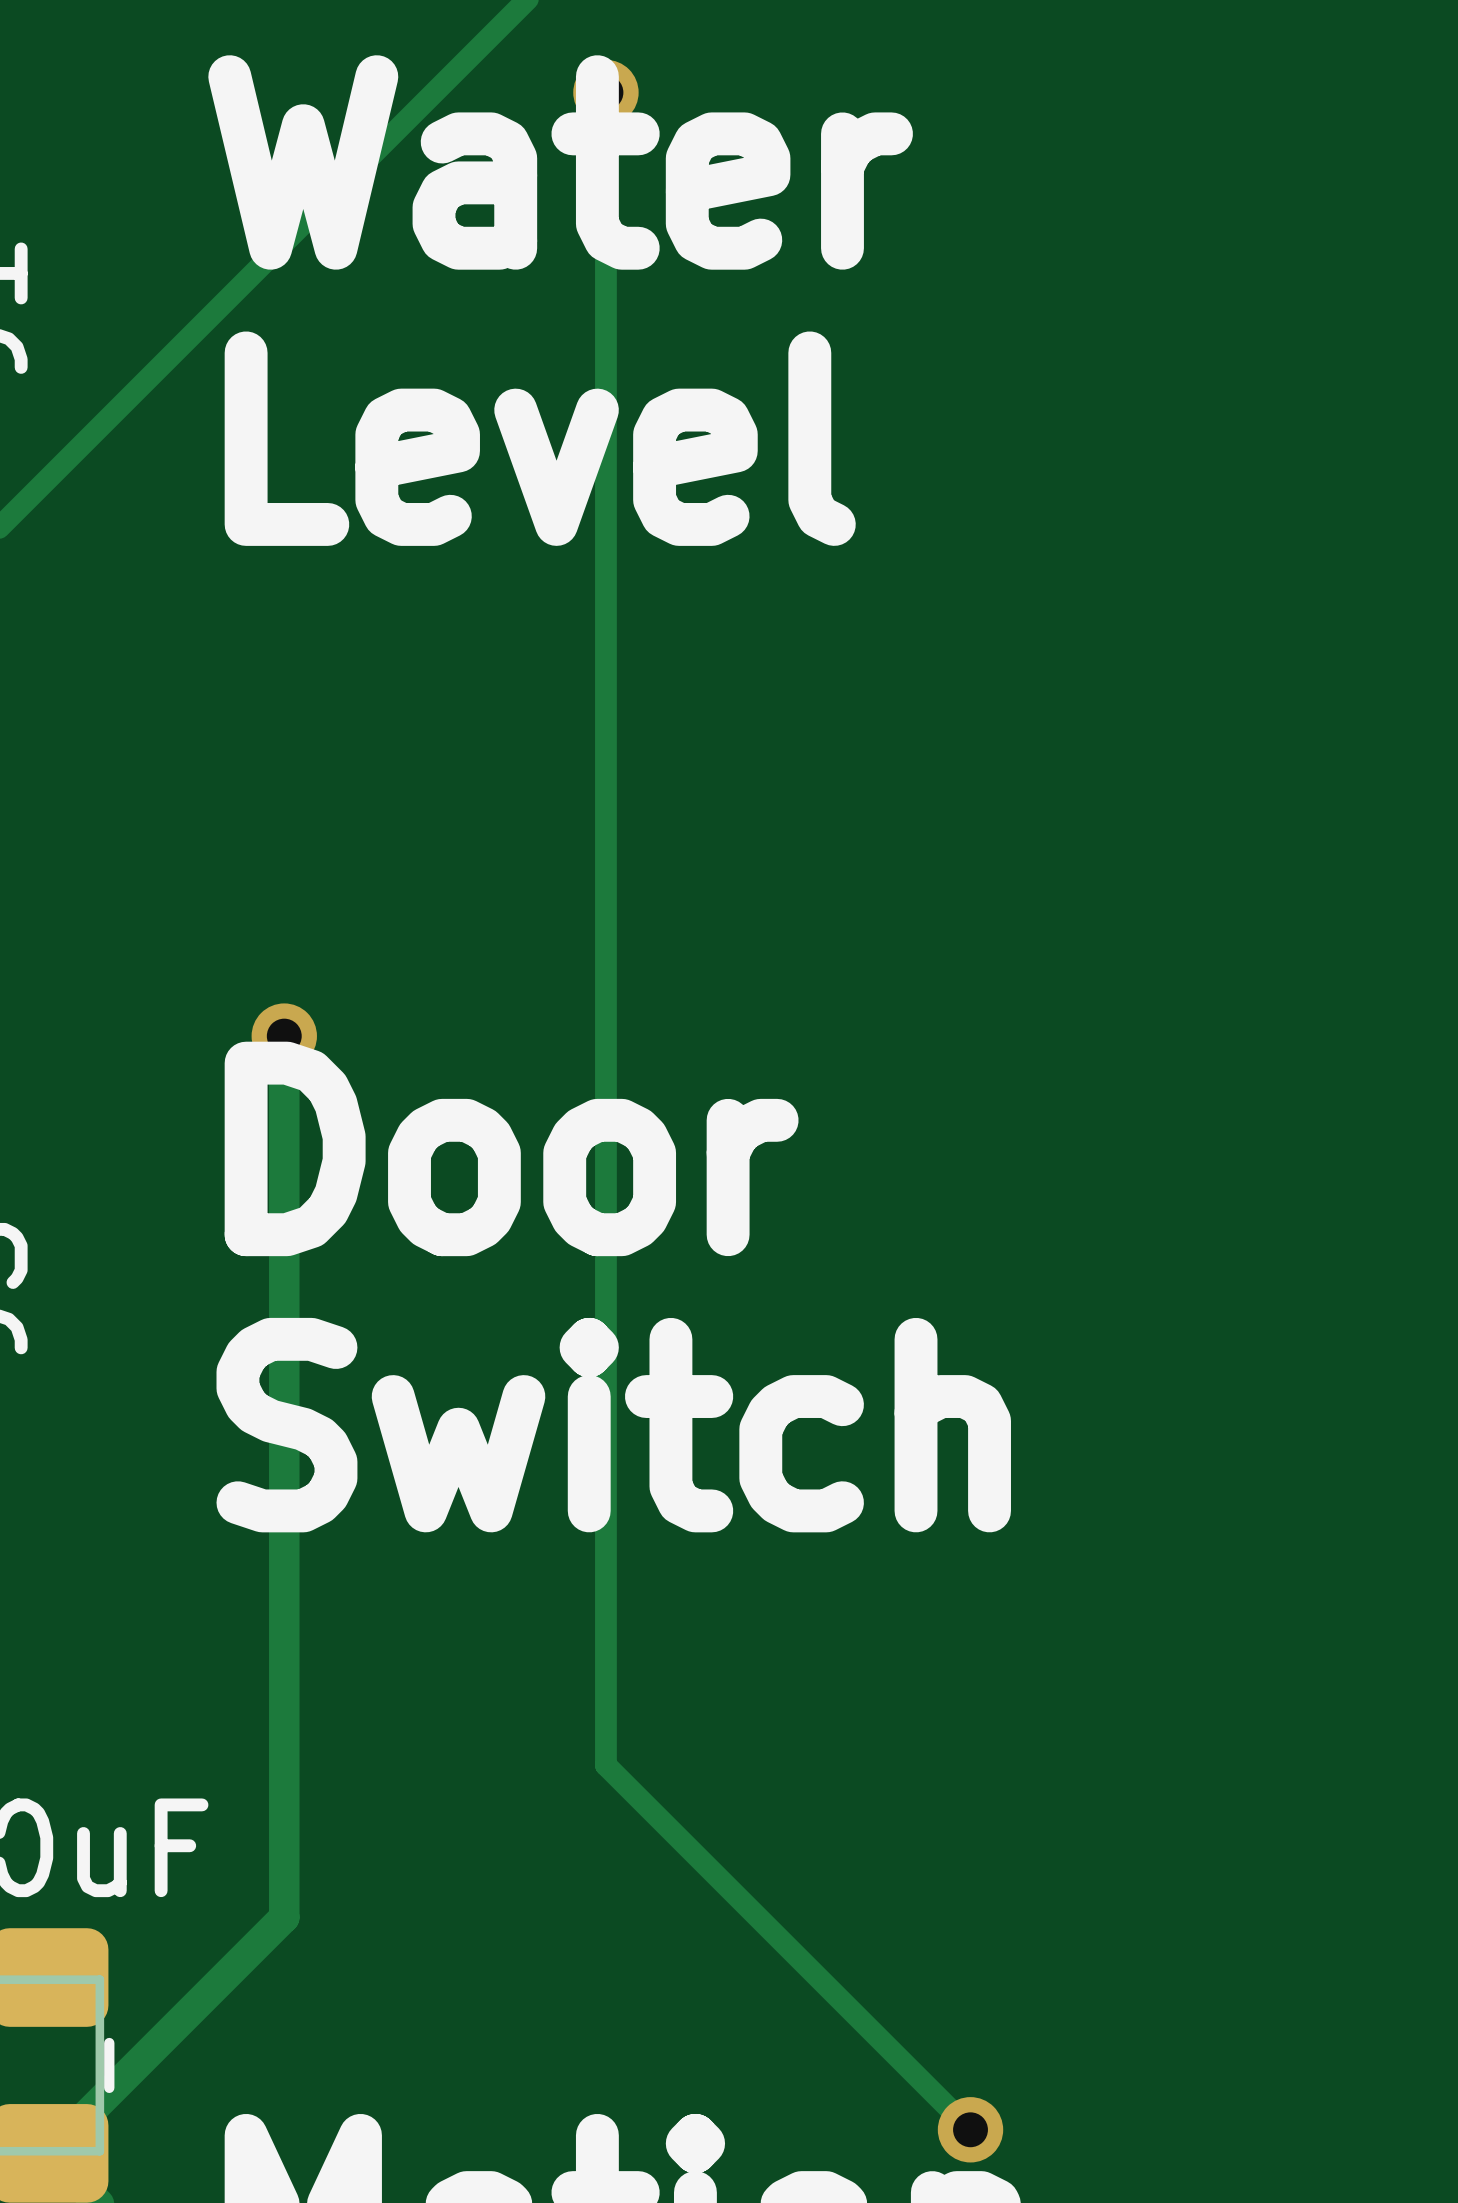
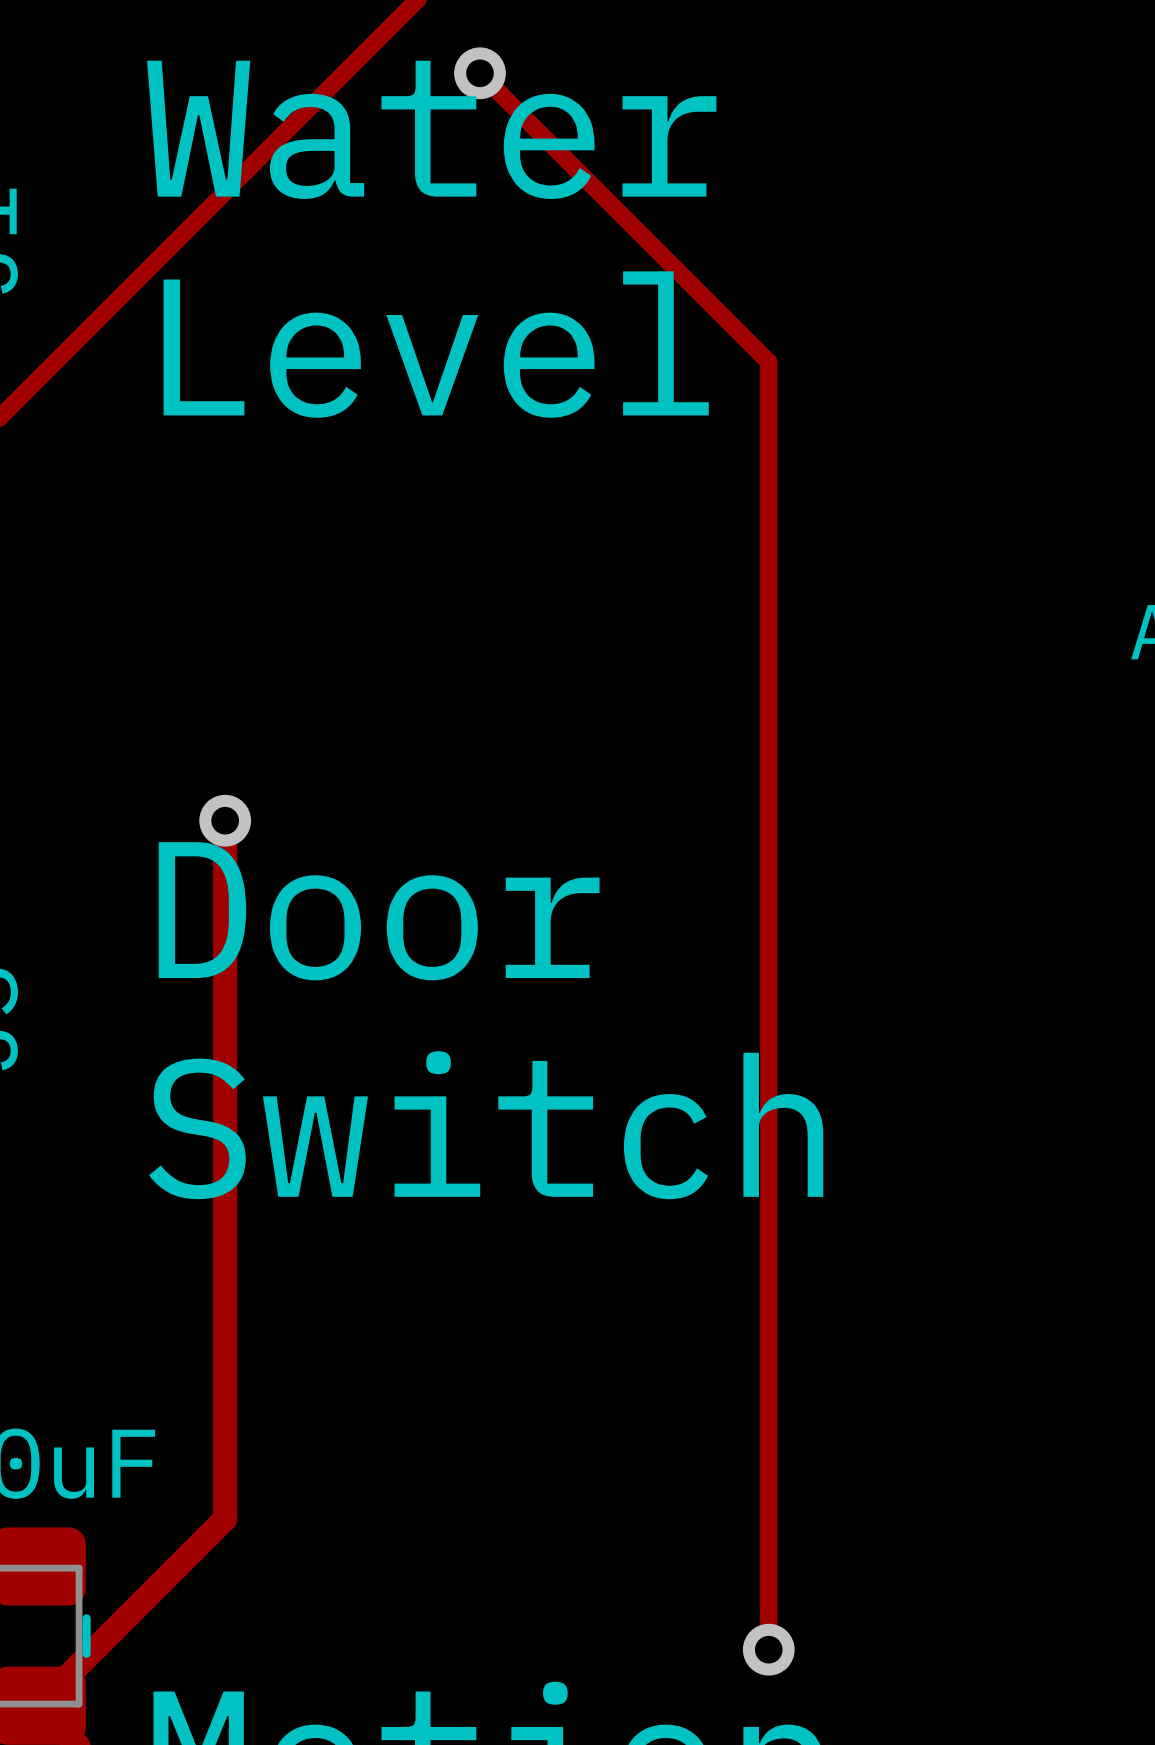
track: (605, 92) (605, 1765) (970, 2129) -> (479, 73) (768, 362) (768, 1649)
via position: (970, 2129) -> (768, 1649)

